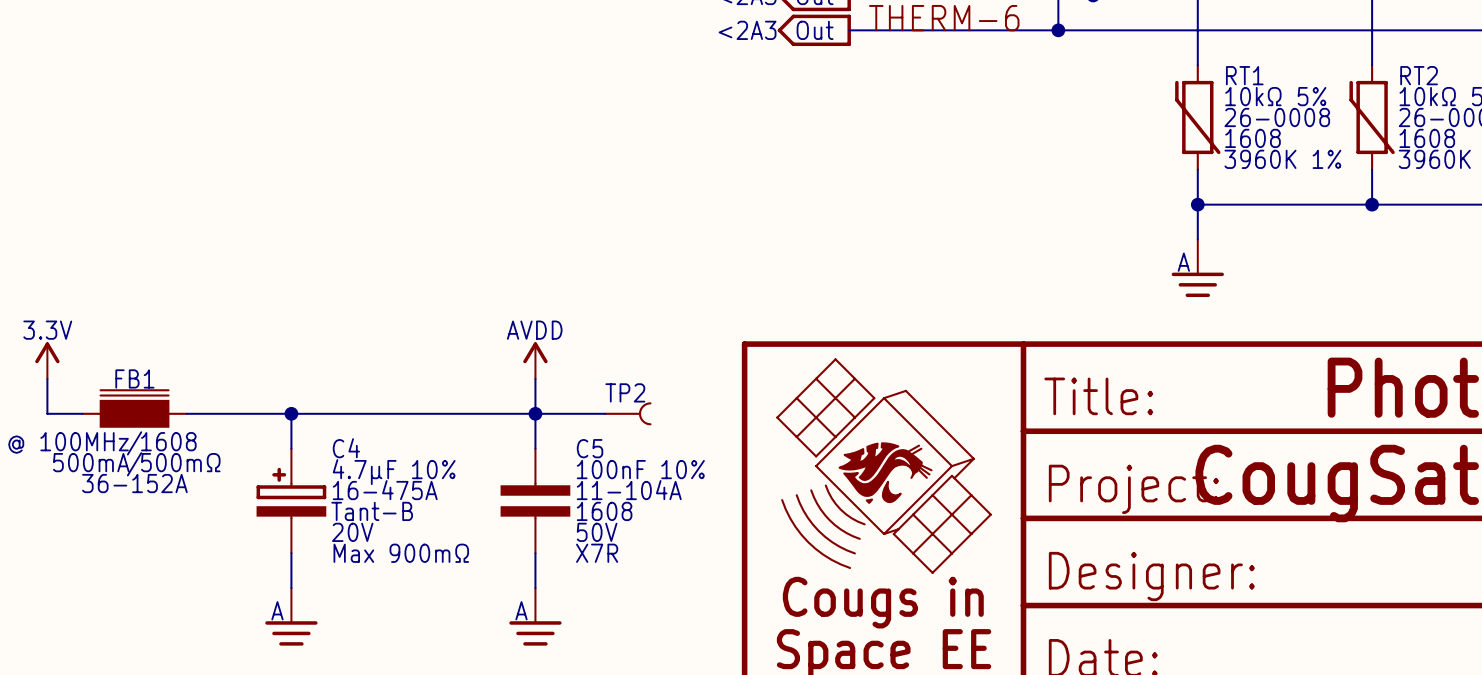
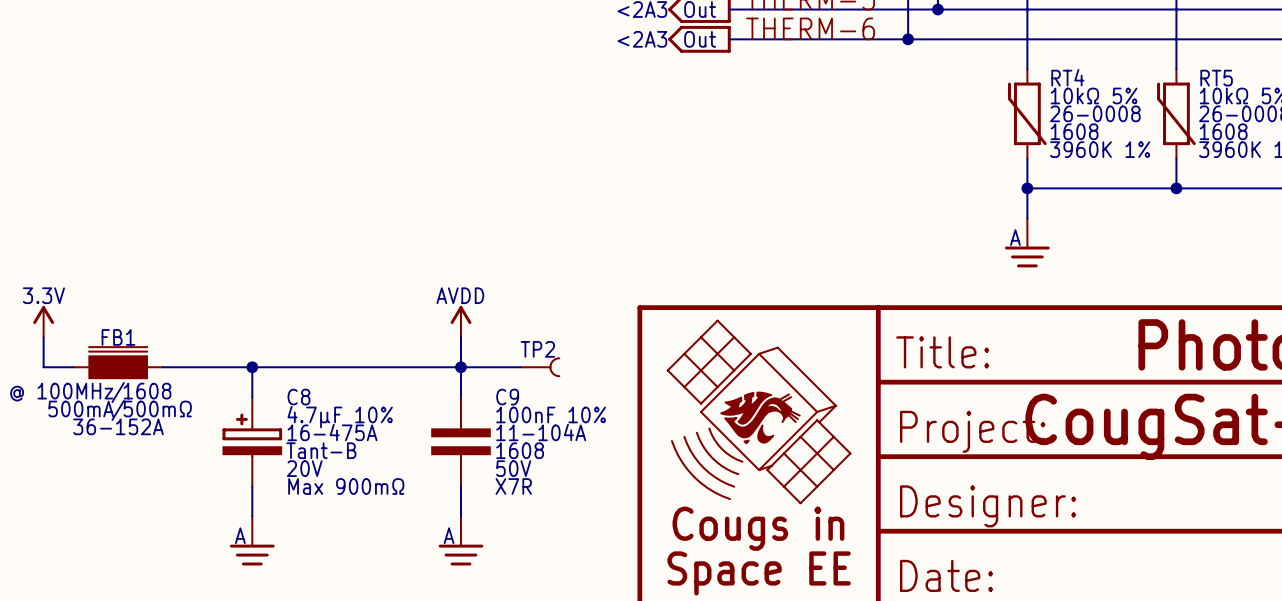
RT1 name: RT1 (1244, 75) -> RT4 (1067, 77)
RT2 name: RT2 (1419, 75) -> RT5 (1216, 78)
C4 name: C4 (346, 448) -> C8 (298, 397)
C5 name: C5 (590, 448) -> C9 (507, 397)

